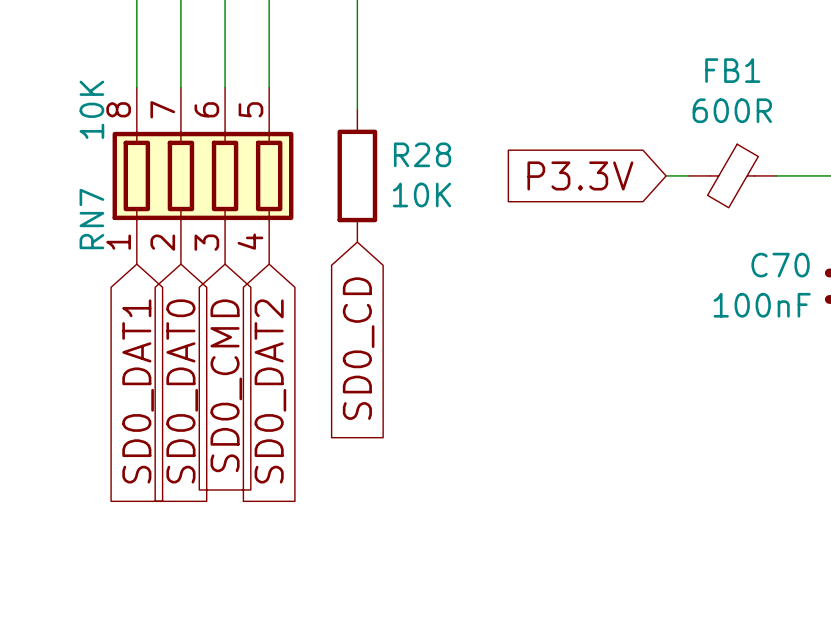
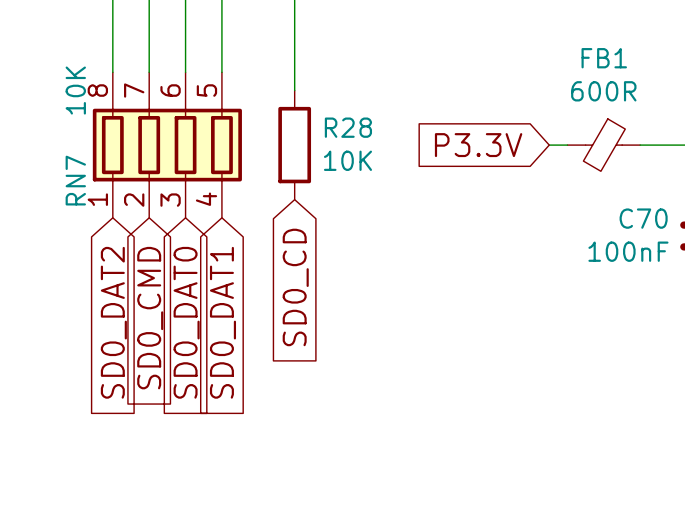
global label: SD0_CMD (226, 385) -> SD0_DAT0 (186, 322)
global label: SD0_DAT1 (138, 391) -> SD0_DAT2 (113, 322)
global label: SD0_DAT0 (182, 391) -> SD0_CMD (150, 318)
global label: SD0_DAT2 (270, 391) -> SD0_DAT1 (222, 322)

